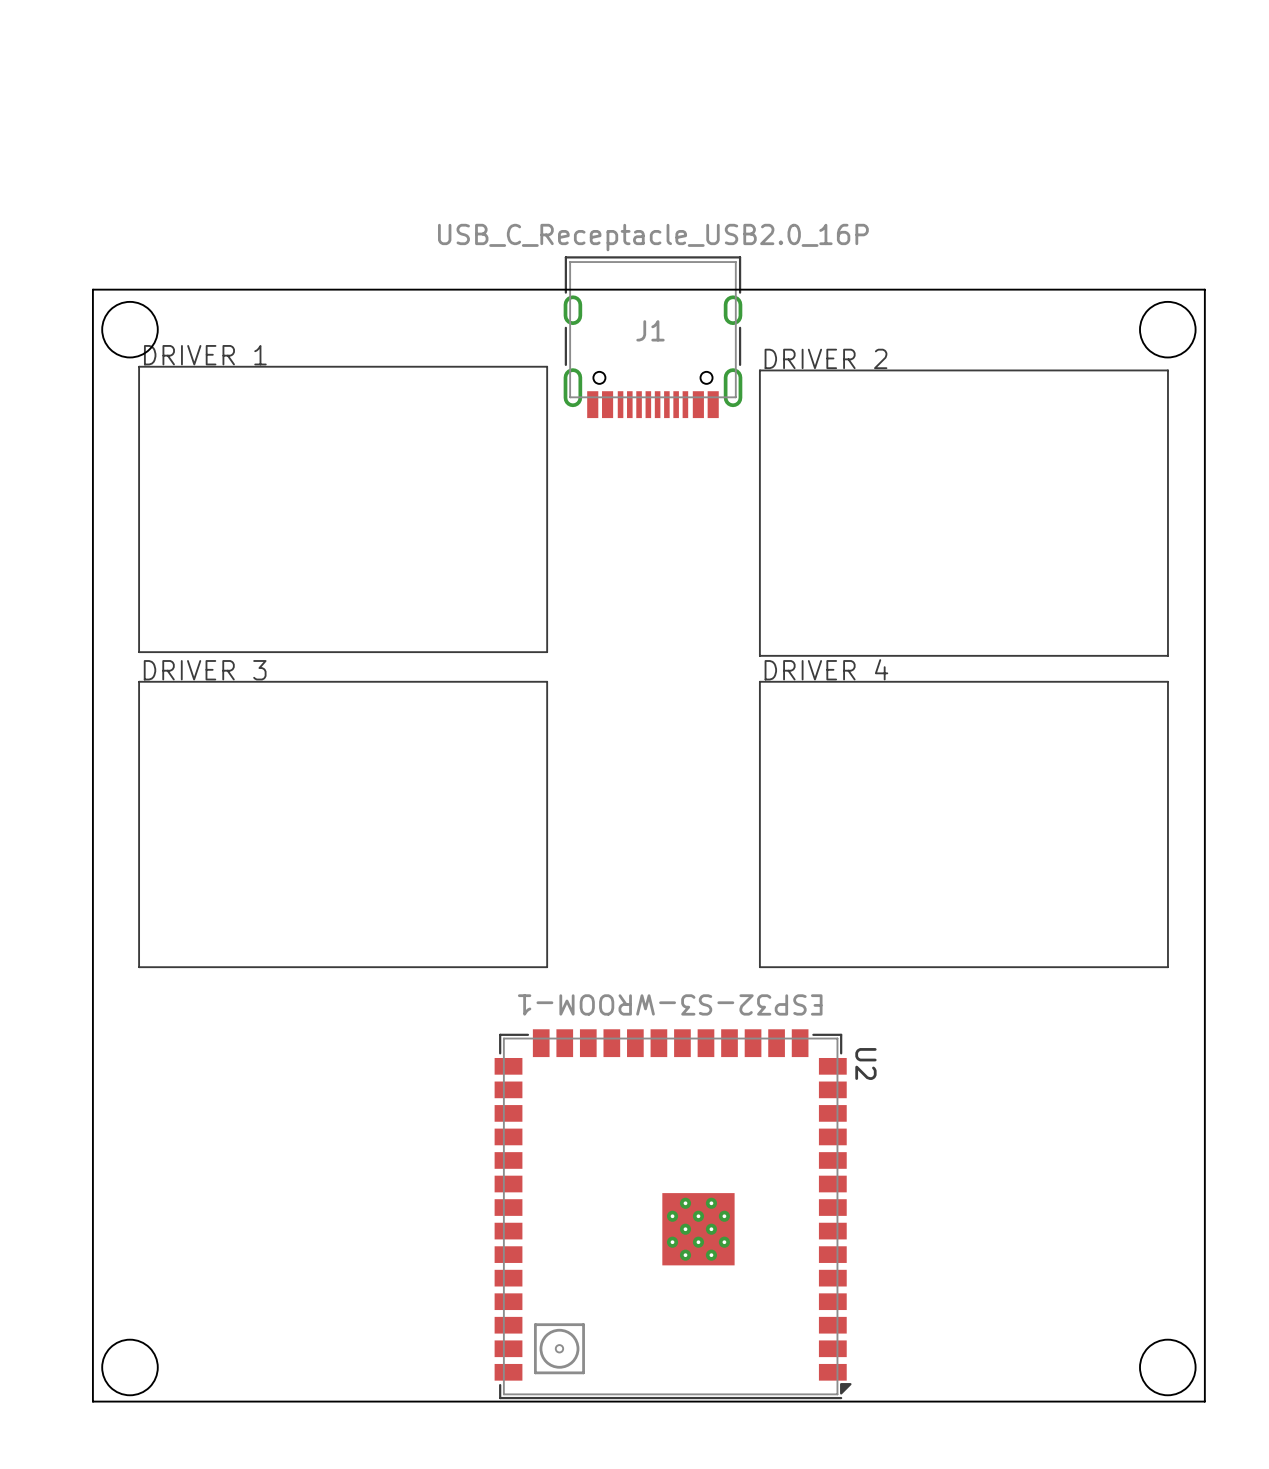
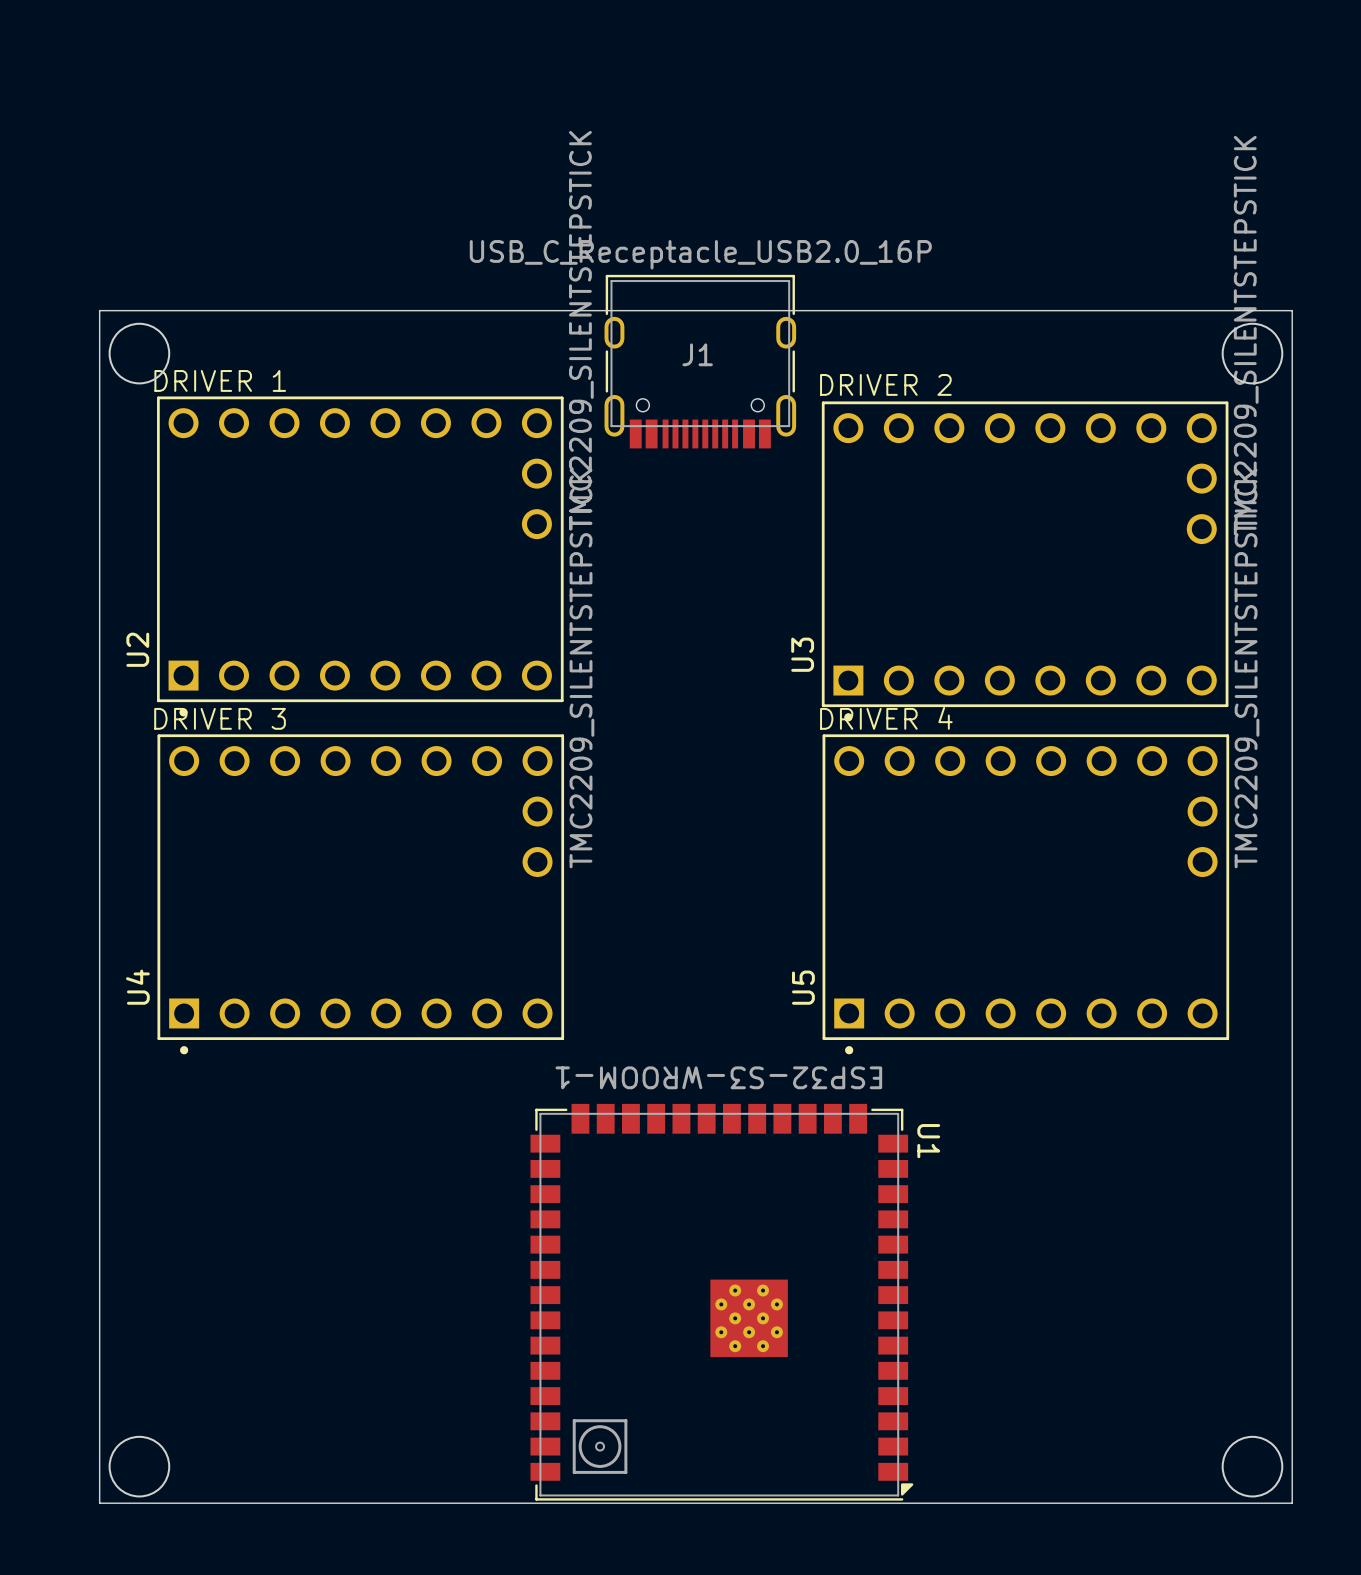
line: (139, 366) (139, 652) (547, 652) (547, 366) (139, 366) -> none
line: (759, 370) (1167, 370) (1167, 655) (759, 655) (759, 370) -> none
U2: none -> TMC2209_SILENTSTEPSTICK (360, 556)
U3: none -> TMC2209_SILENTSTEPSTICK (1025, 561)
line: (139, 681) (547, 681) (547, 967) (139, 967) (139, 681) -> none
line: (759, 681) (1167, 681) (1167, 967) (759, 967) (759, 681) -> none
U4: none -> TMC2209_SILENTSTEPSTICK (360, 894)
U5: none -> TMC2209_SILENTSTEPSTICK (1025, 894)
U2 name: U2 (865, 1063) -> U1 (928, 1141)

